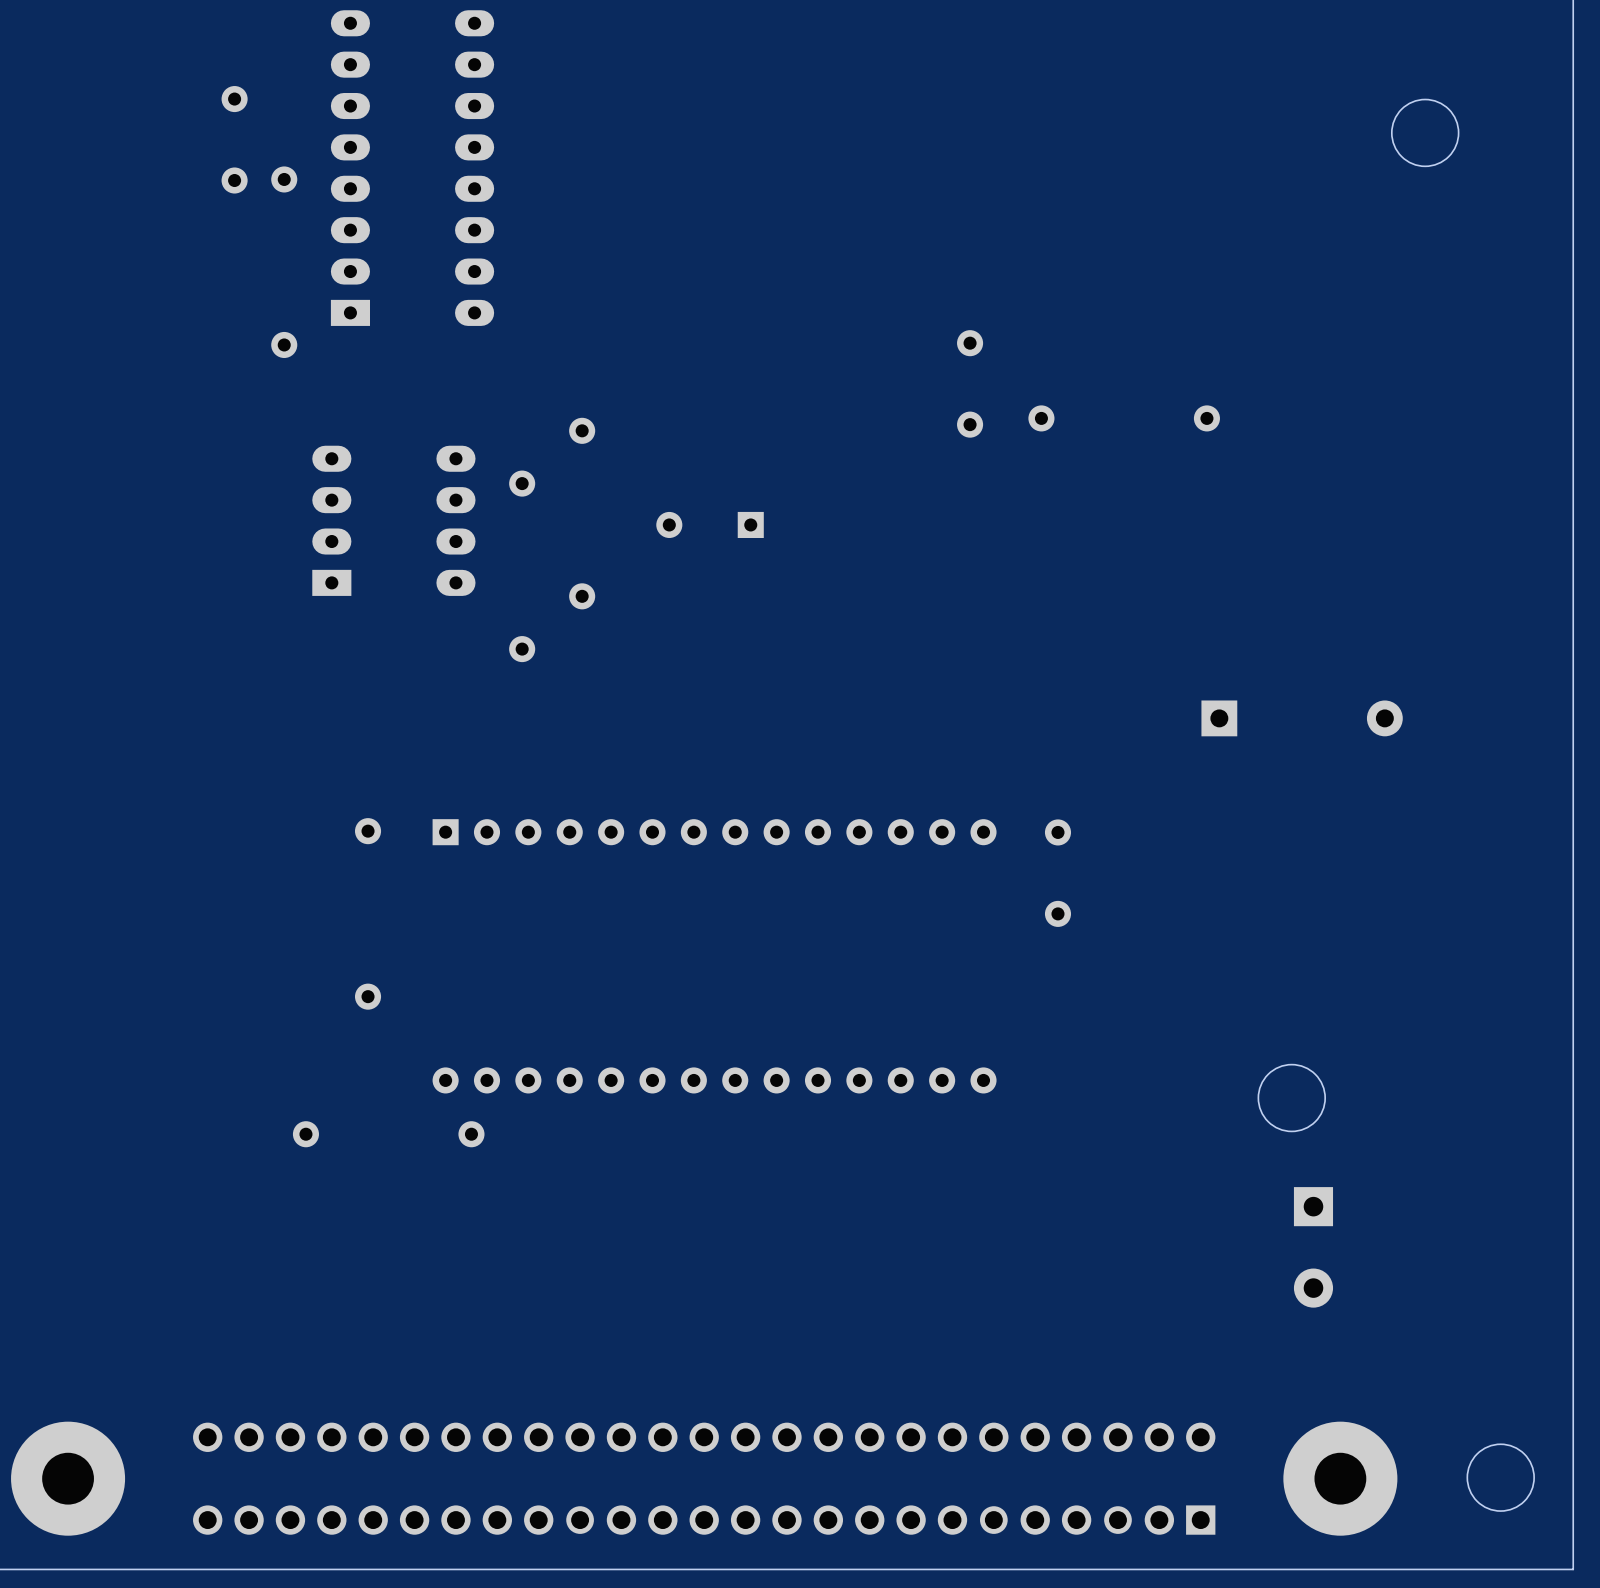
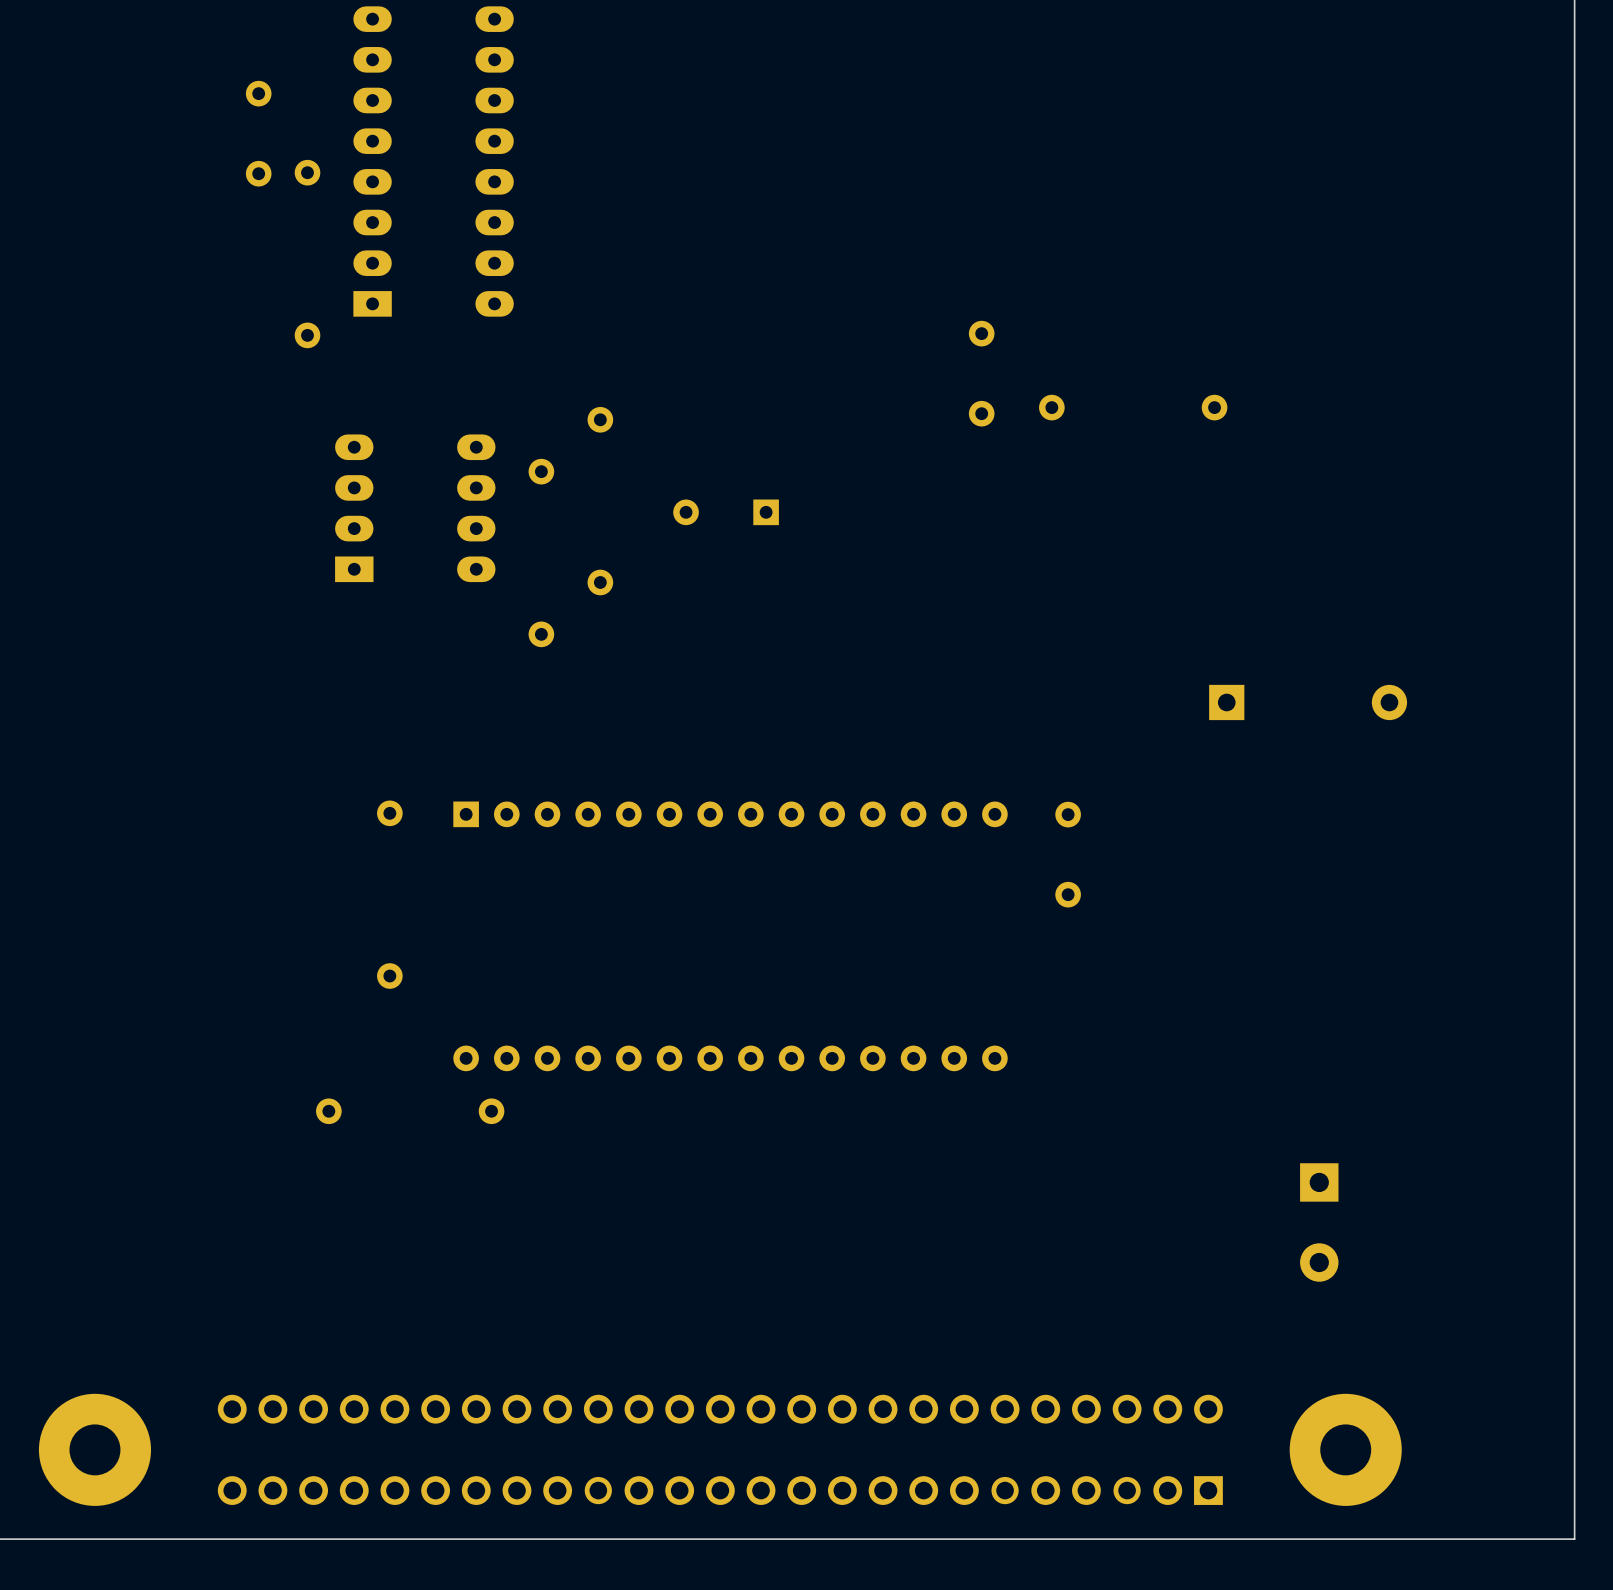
round board edge: [1391, 99, 1460, 167] -> none
round board edge: [1257, 1064, 1326, 1132] -> none
round board edge: [1466, 1443, 1535, 1512] -> none

